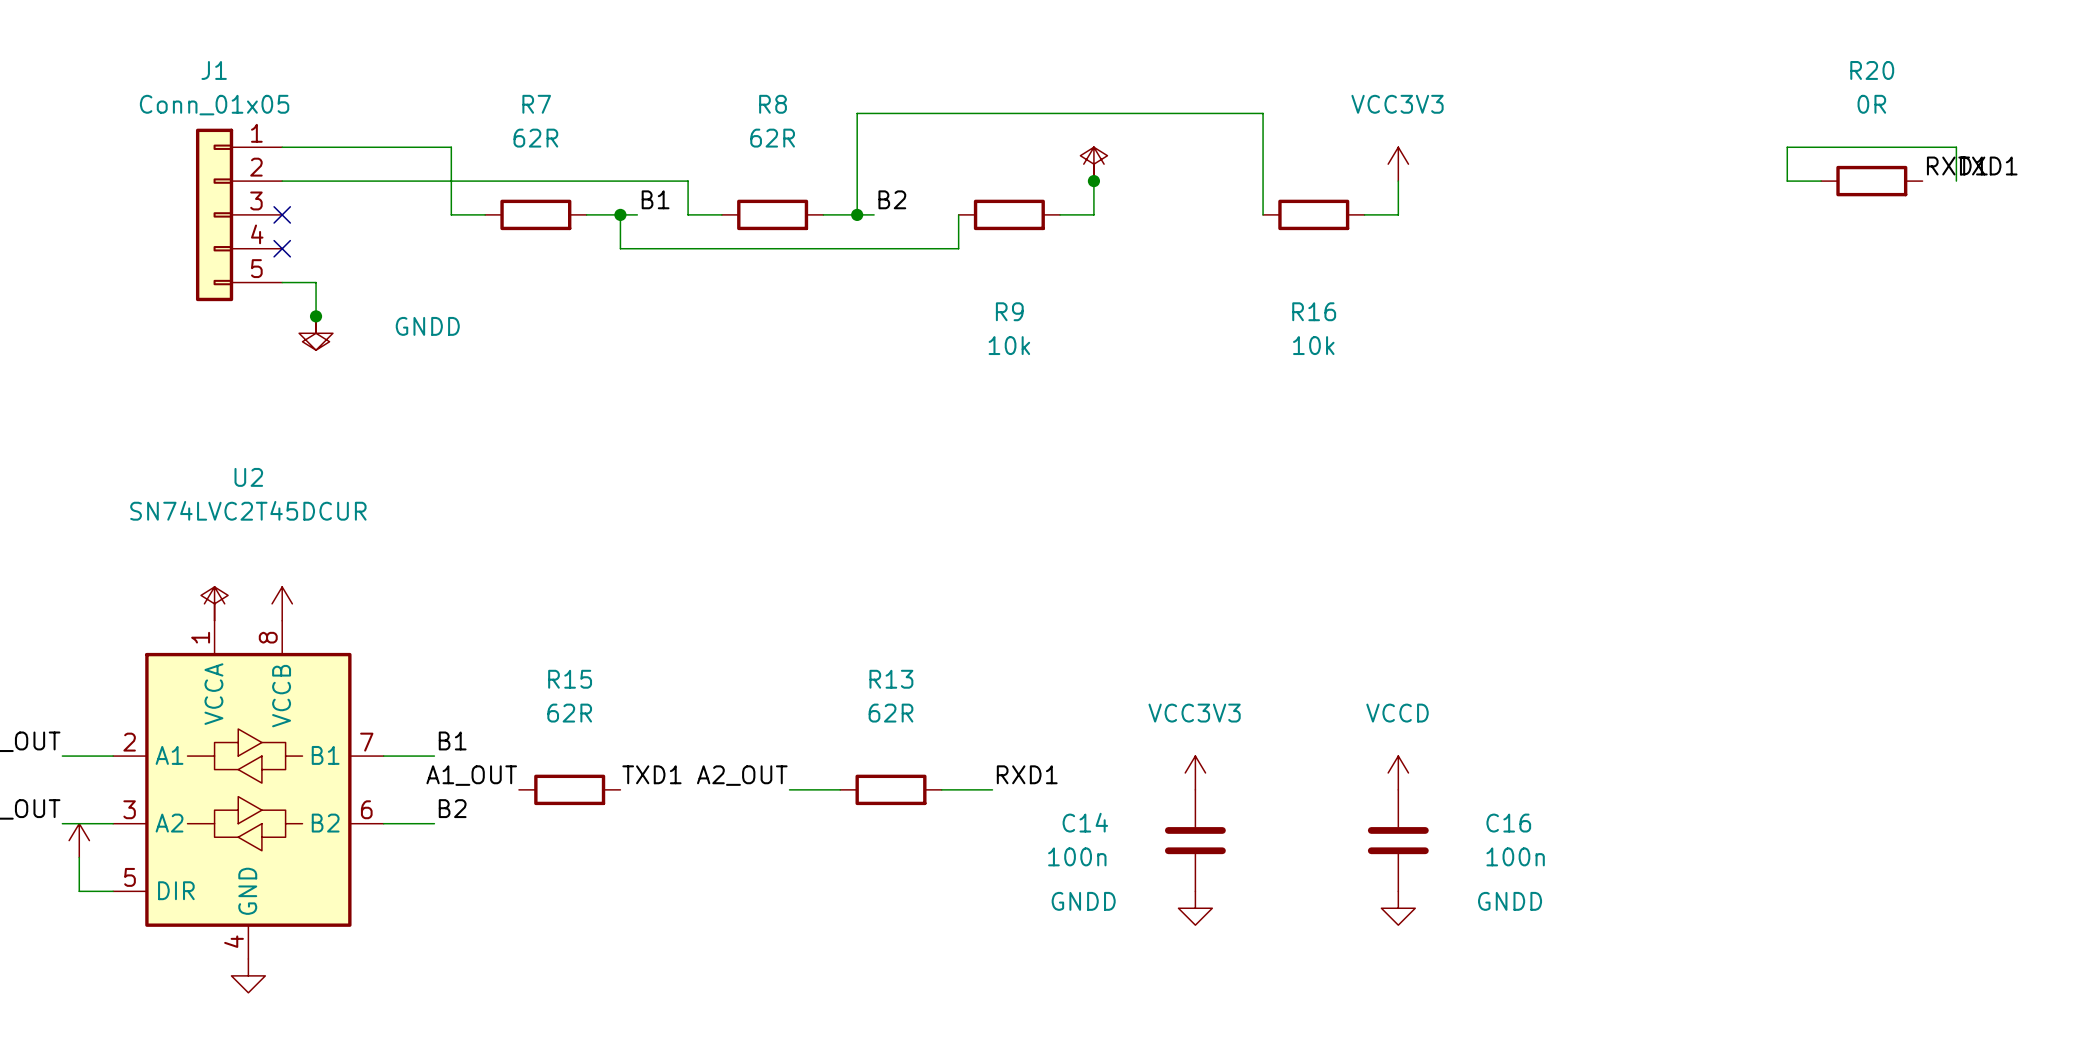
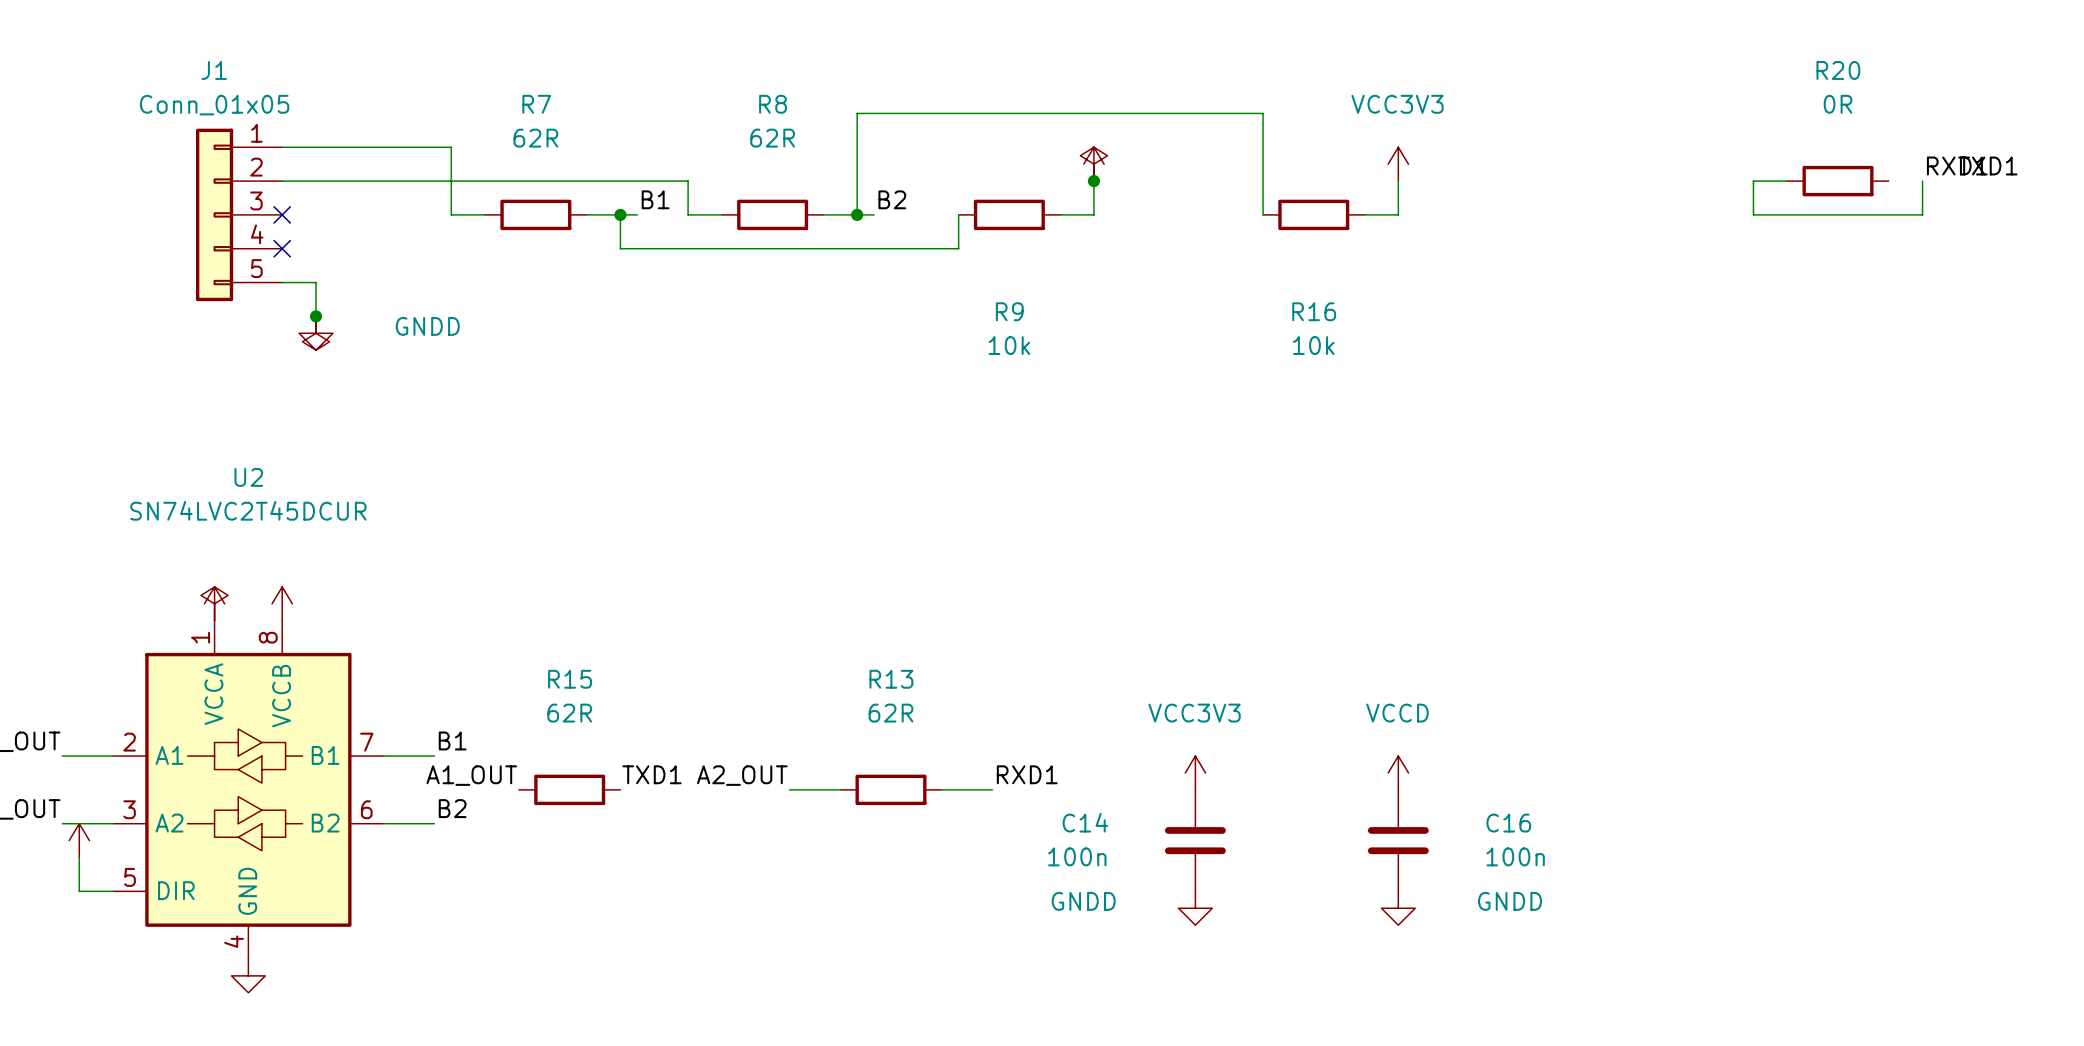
wire: none -> (1787, 181) (1753, 181) (1753, 214) (1922, 214) (1922, 181)
wire: (1821, 181) (1787, 181) (1787, 147) (1956, 147) (1956, 181) -> none
R20 position: (1871, 181) -> (1838, 181)

